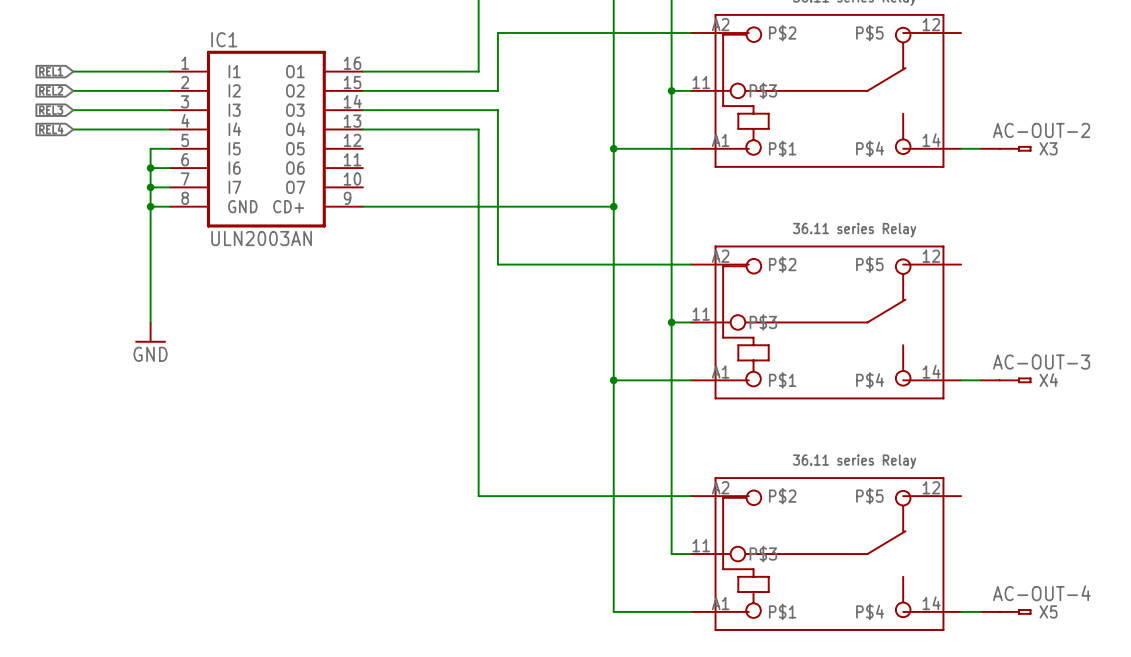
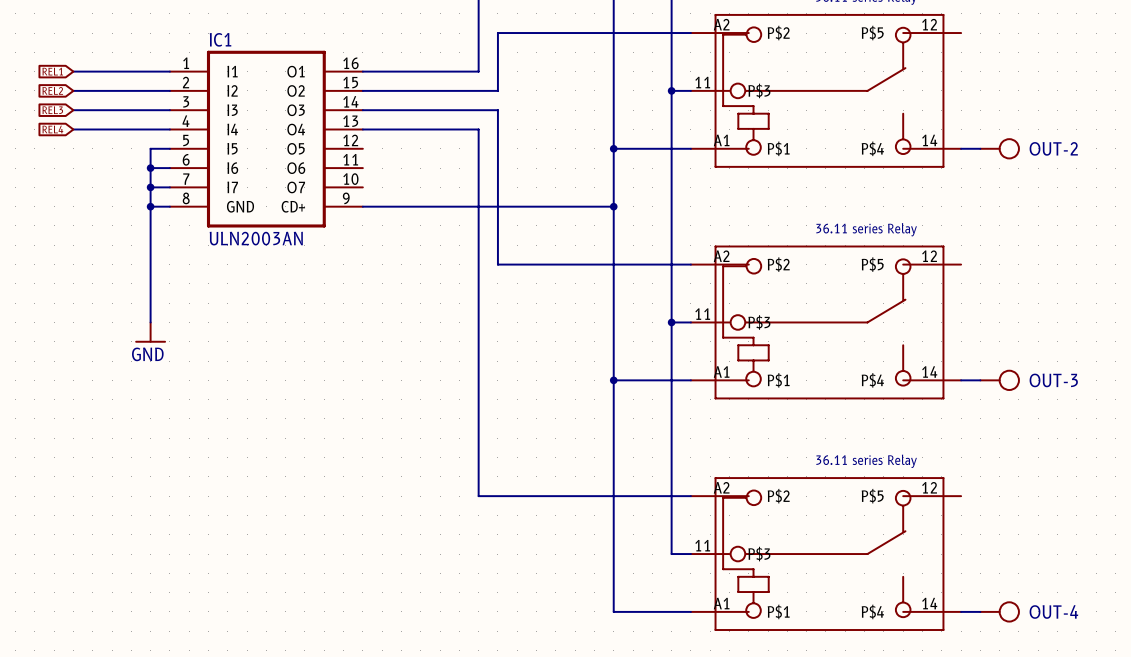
OUT-2: none -> (1000, 148)
X3: AC-OUT-2 (1005, 148) -> none
OUT-3: none -> (1000, 380)
X4: AC-OUT-3 (1005, 380) -> none
OUT-4: none -> (1000, 611)
X5: AC-OUT-4 (1005, 611) -> none

